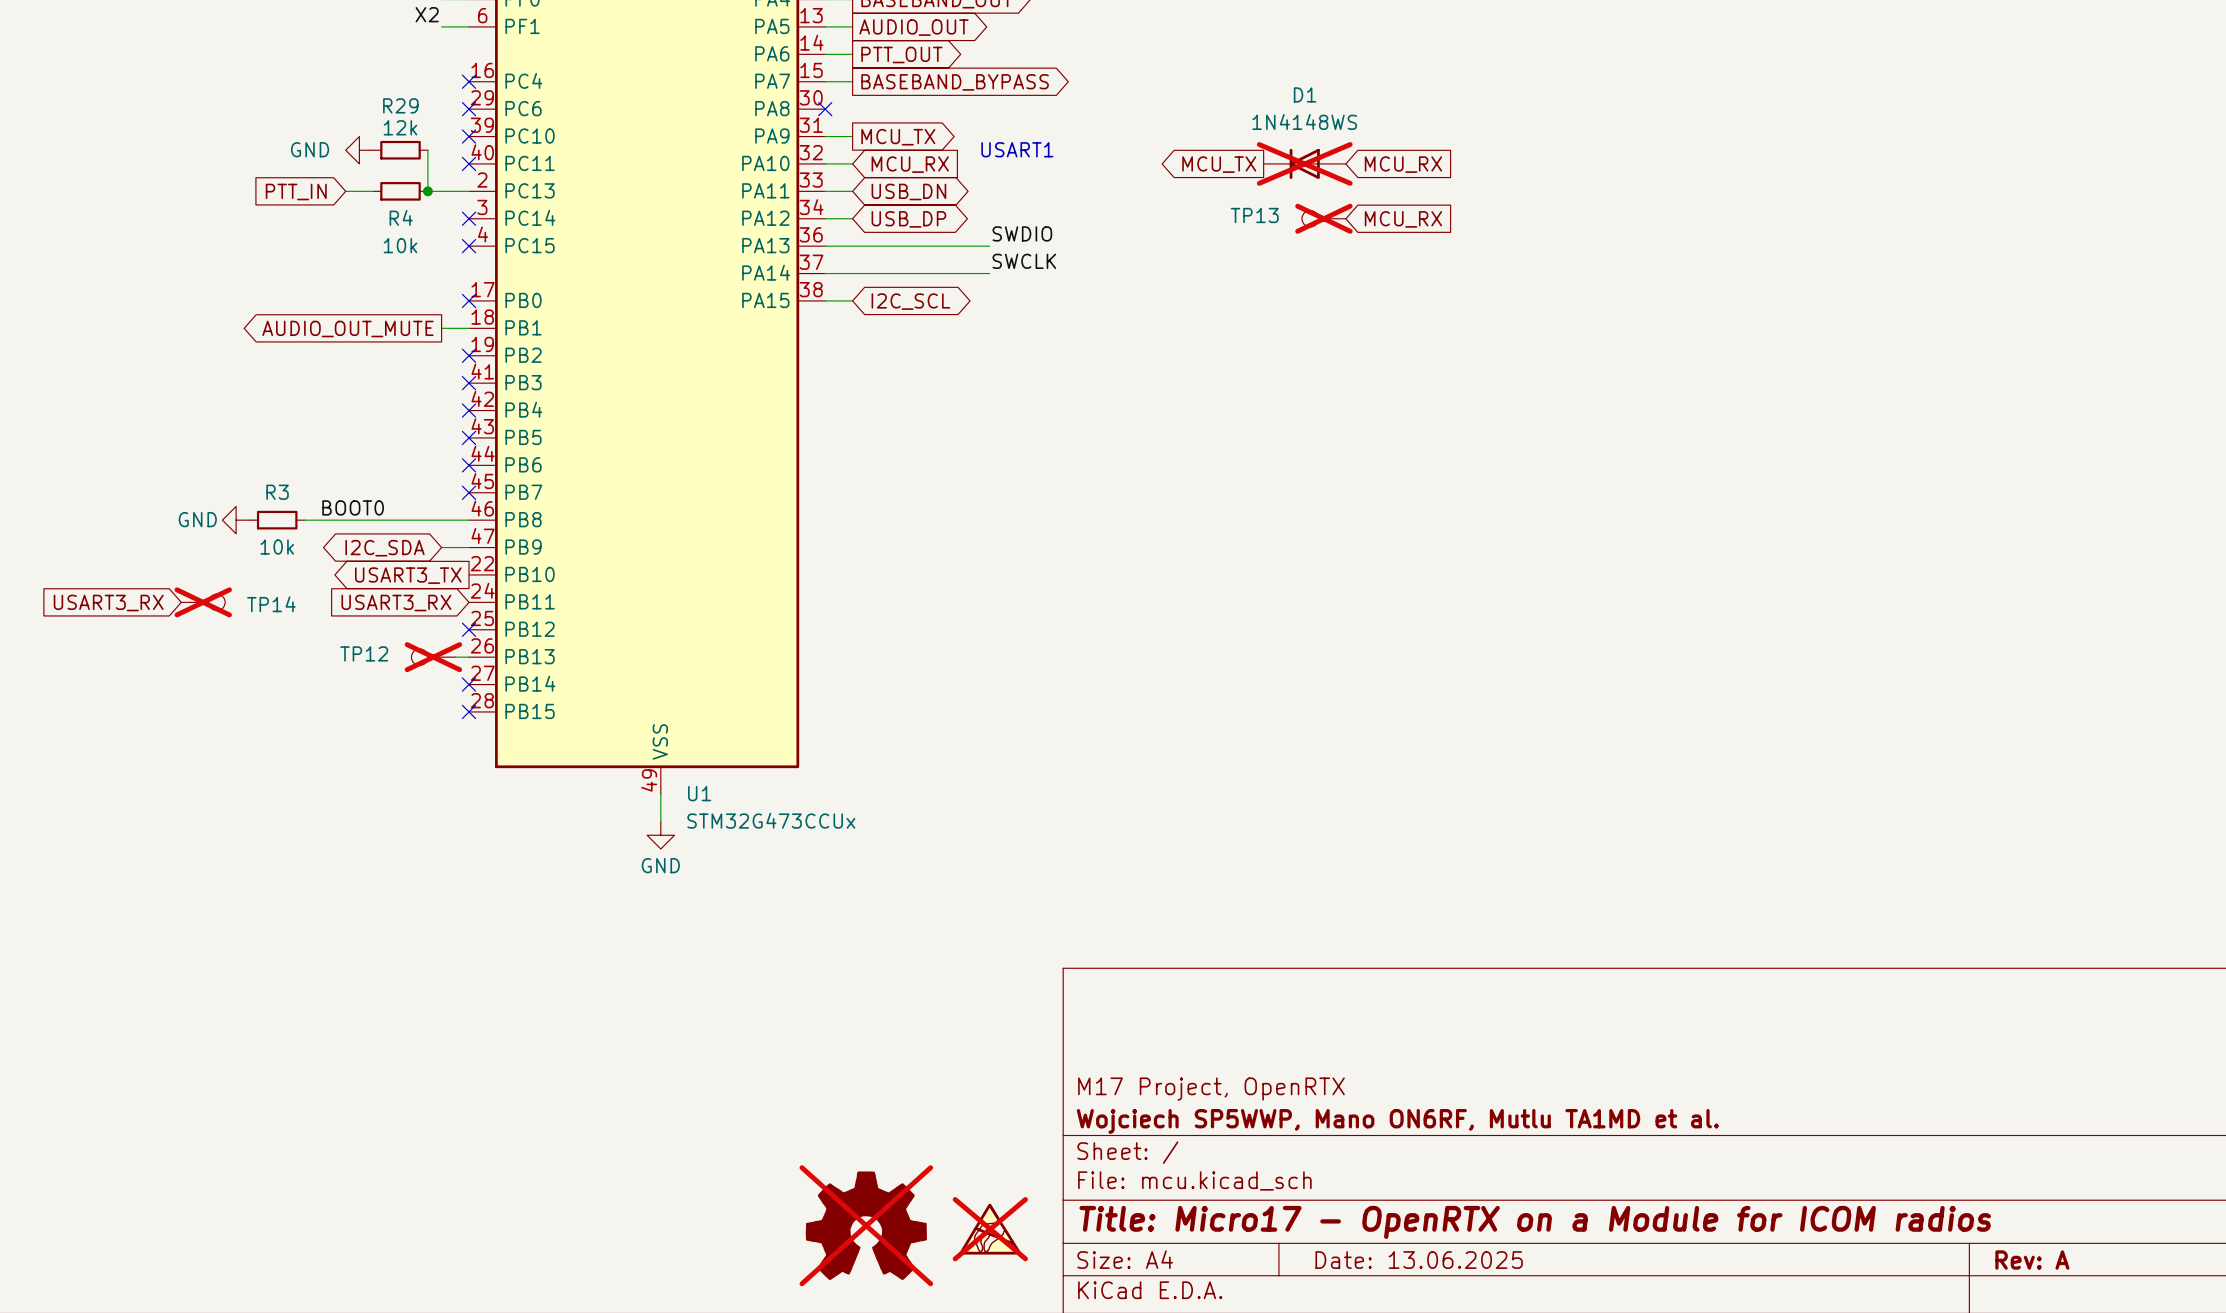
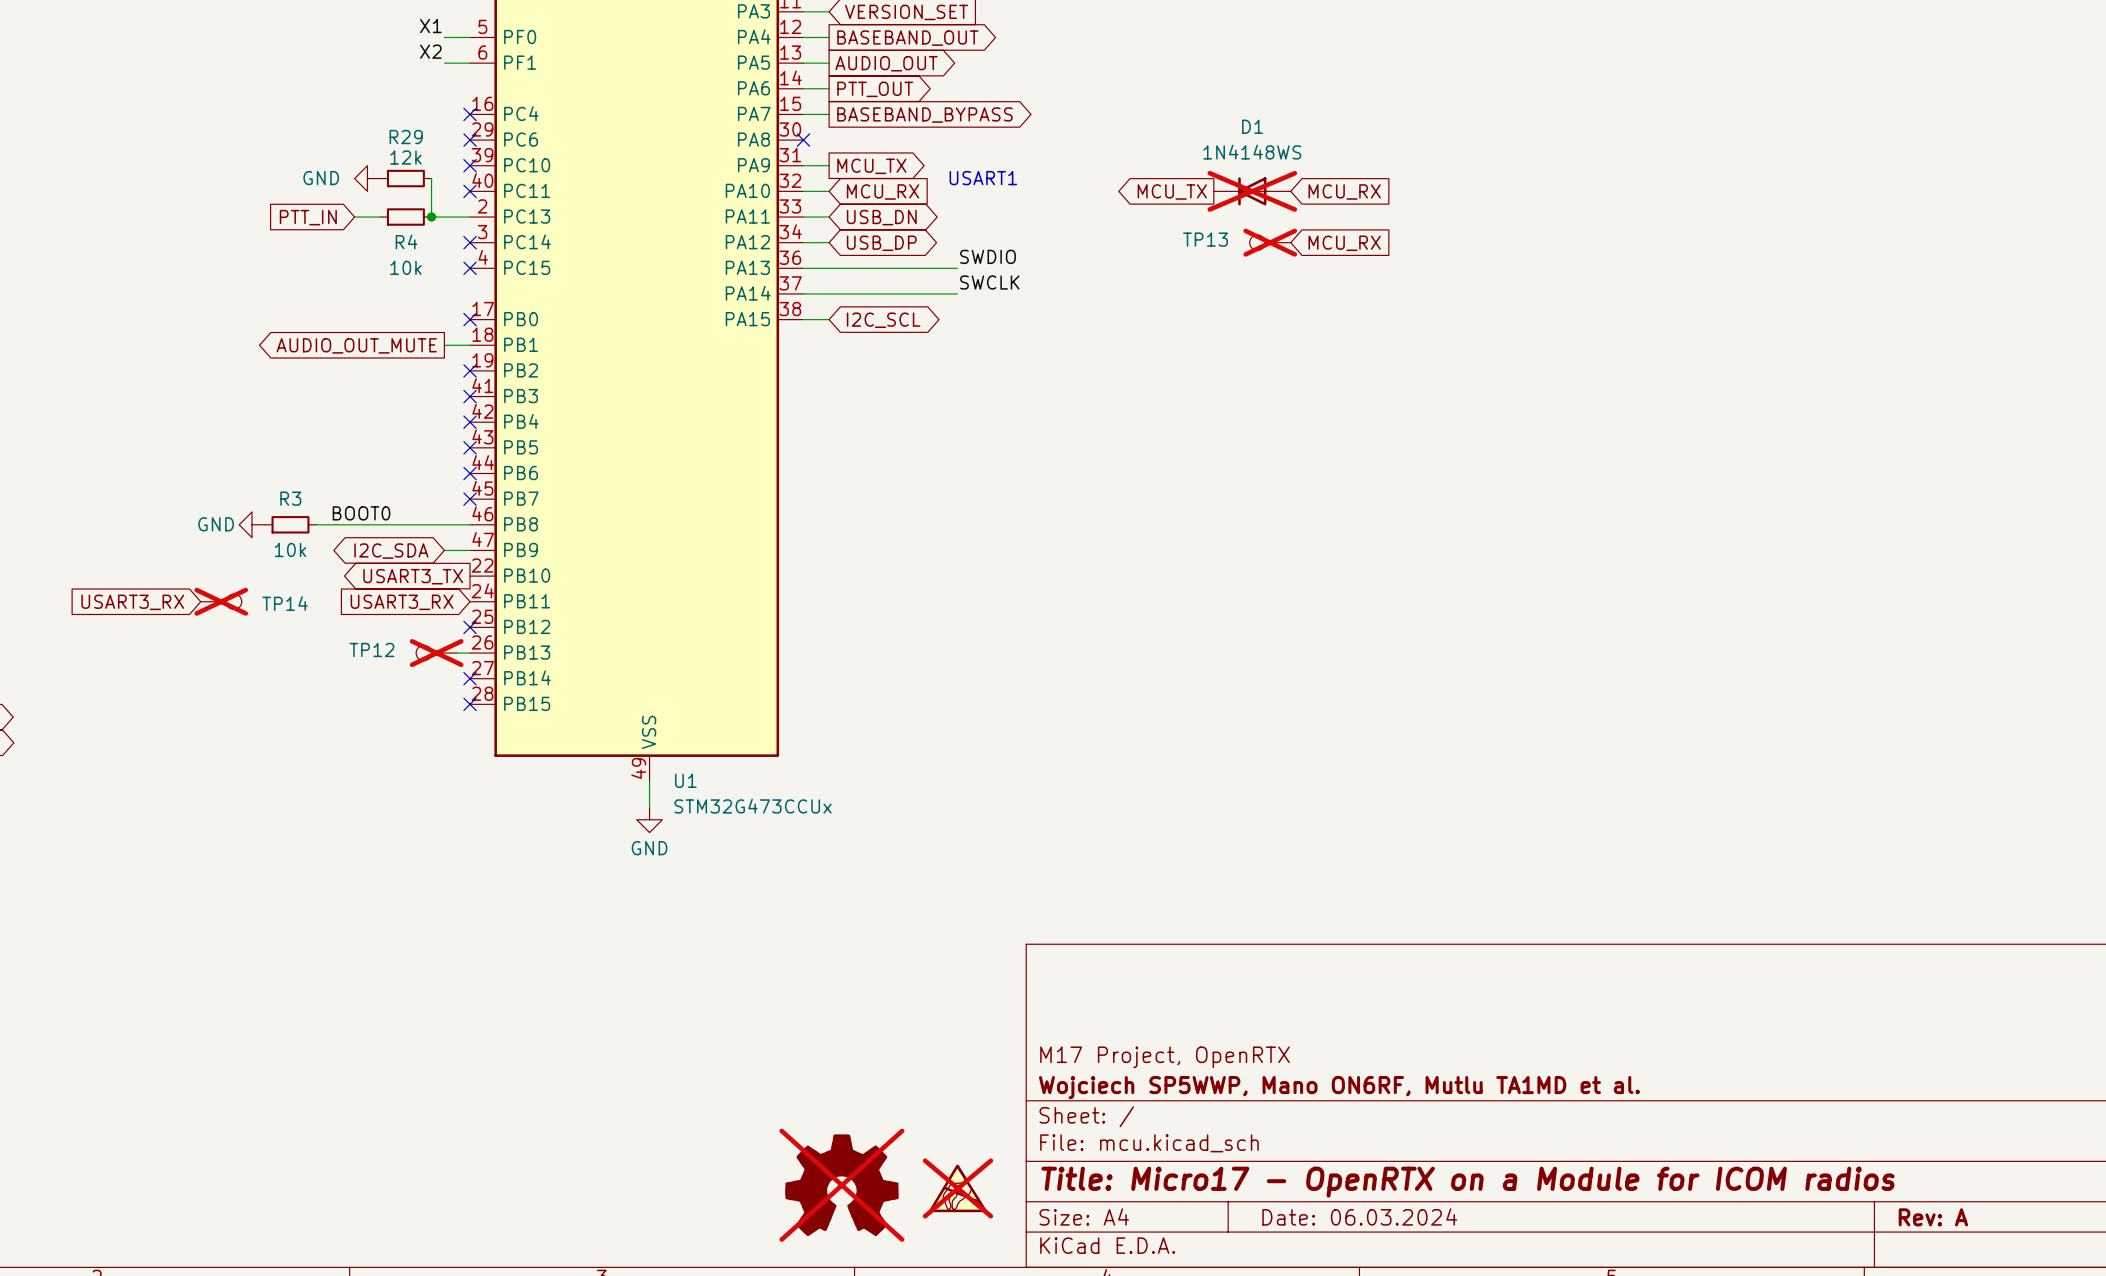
title block: Date: 13.06.2025 (1419, 1260) -> Date: 06.03.2024 (1359, 1216)

